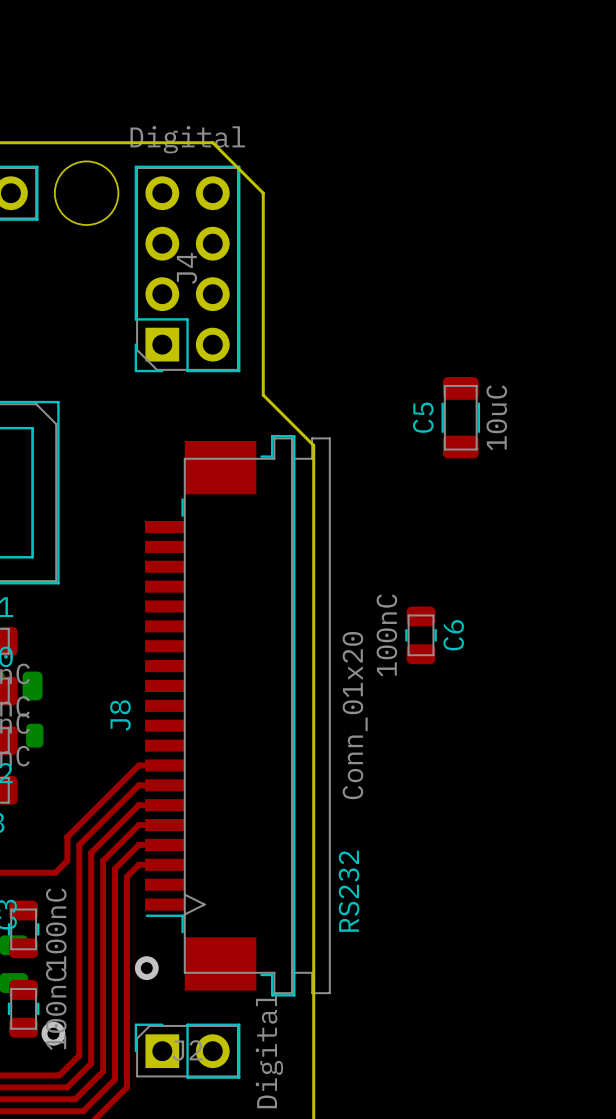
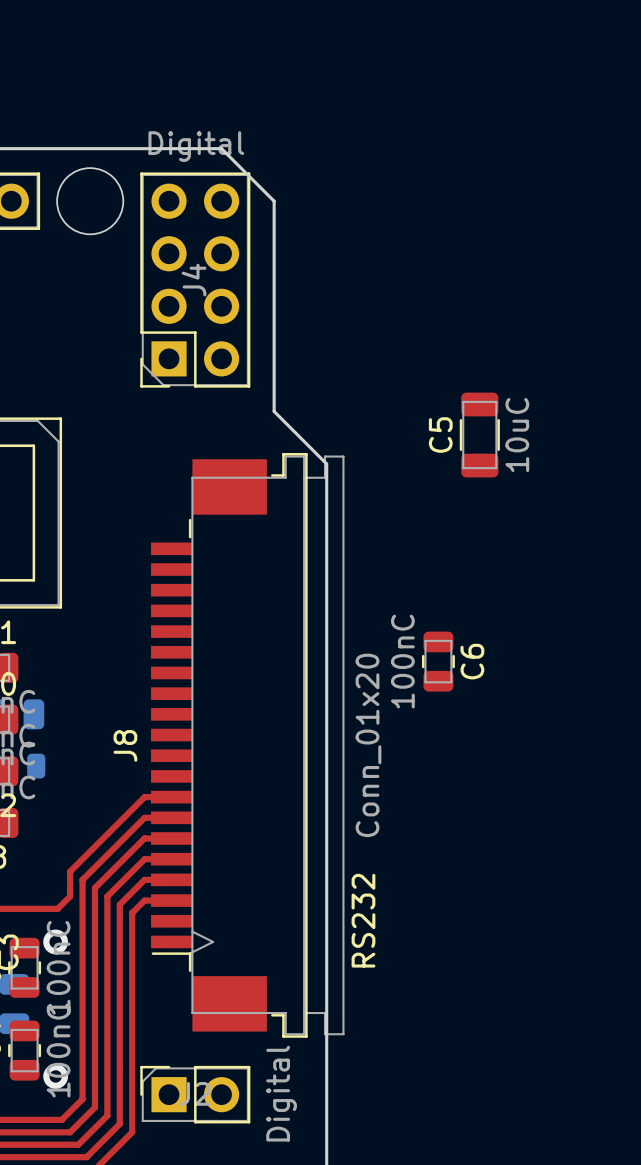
via position: (146, 968) -> (55, 941)

